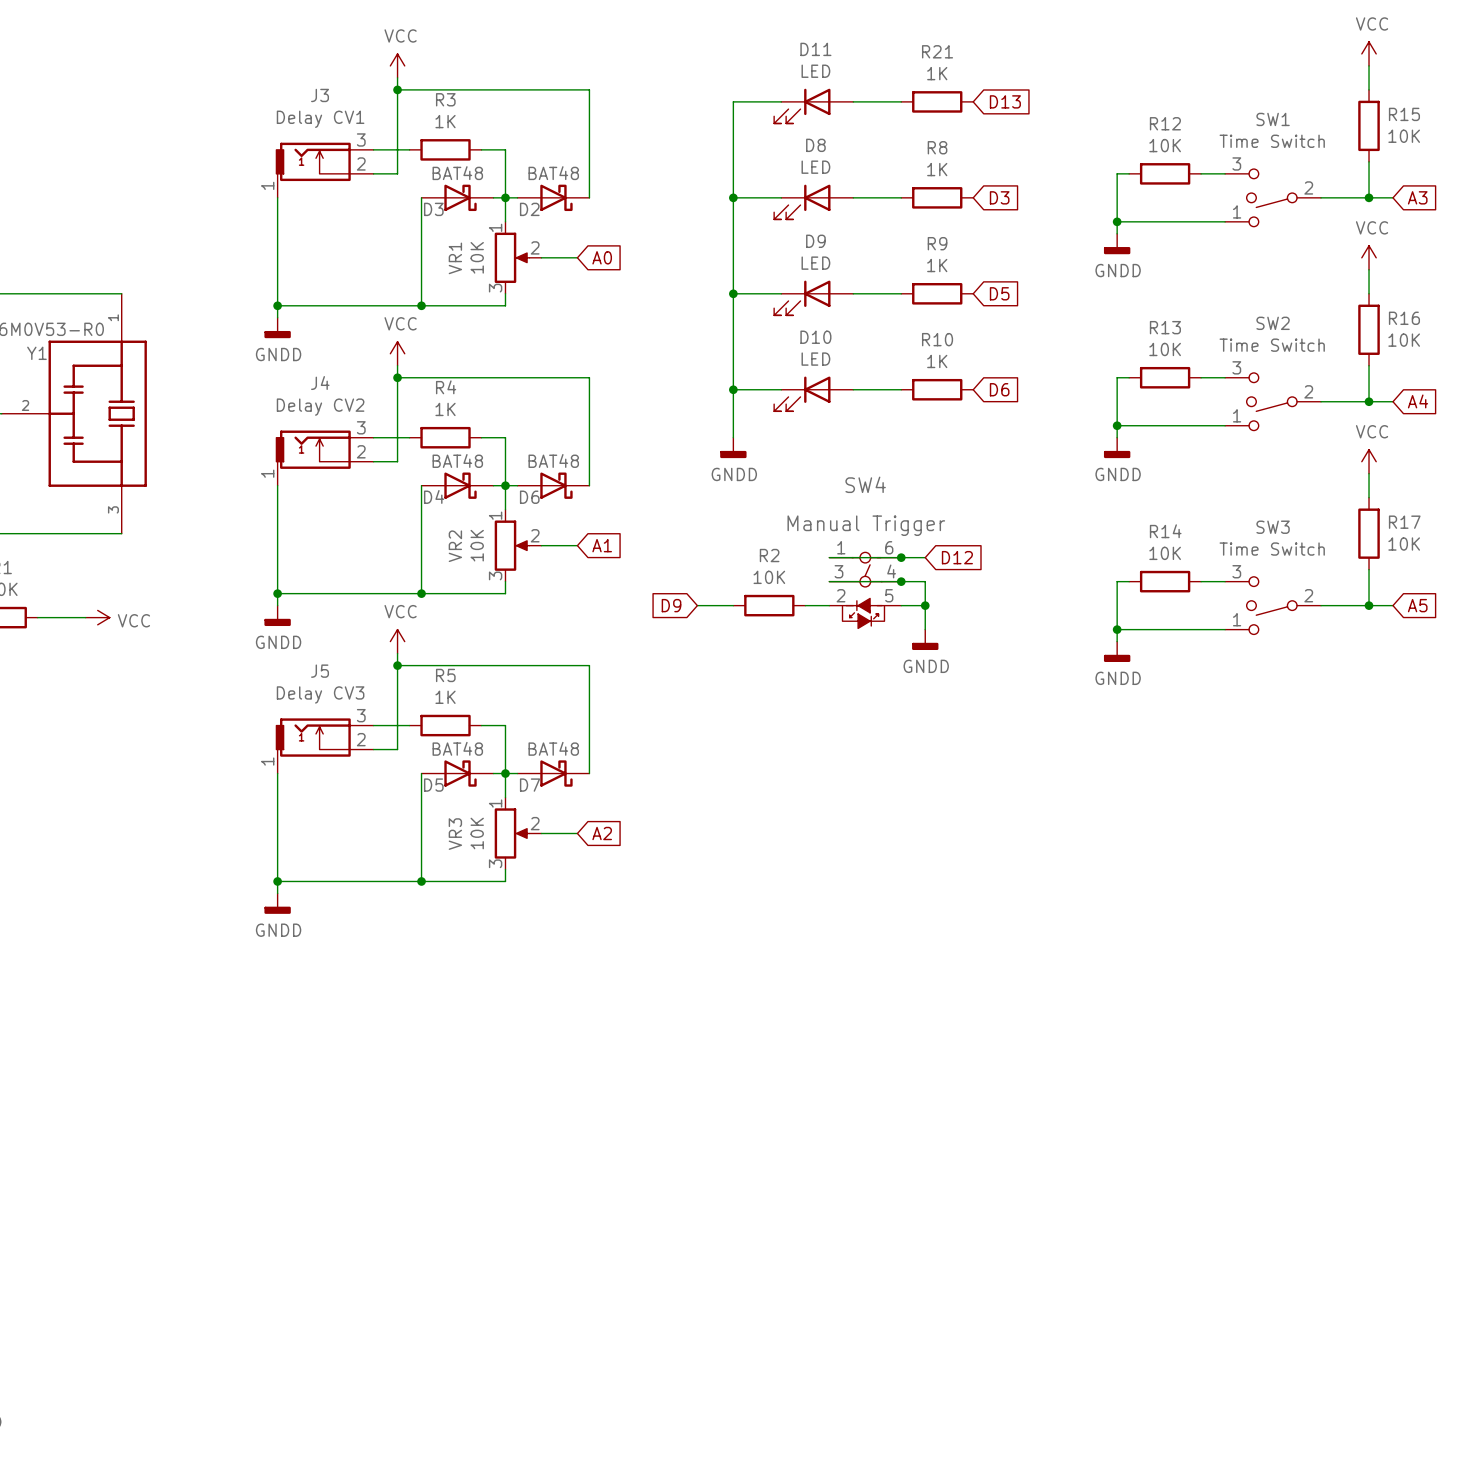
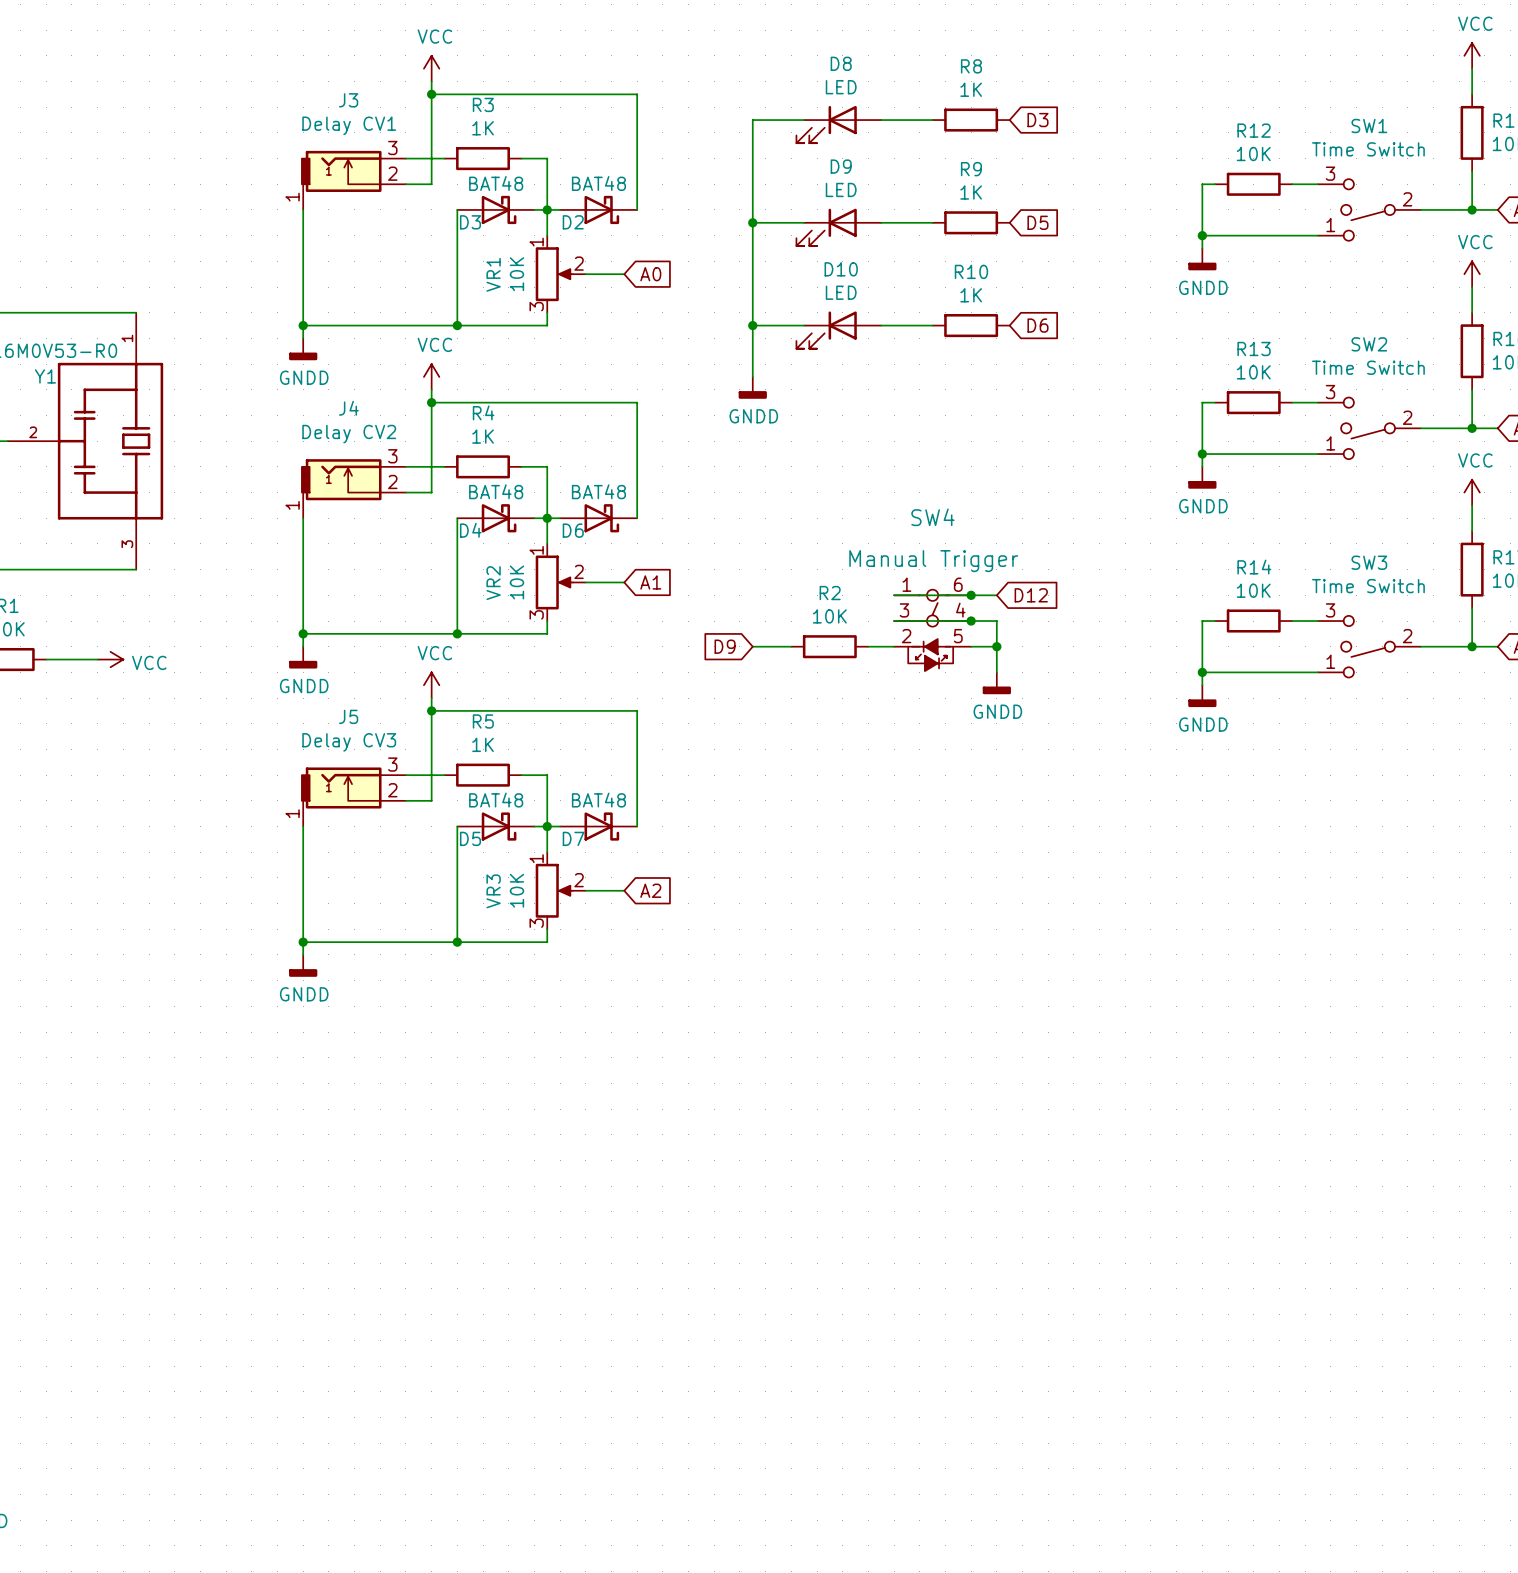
wire: (781, 101) (733, 101) (733, 437) -> none
wire: (853, 101) (901, 101) -> (881, 120) (932, 120)
R21: 1K (937, 101) -> none
global label: D13 (1005, 101) -> none
D11: LED (813, 106) -> none
wire: none -> (804, 120) (752, 120) (752, 376)
wire: (733, 197) (781, 197) -> (752, 222) (804, 222)
junction position: (733, 197) -> (752, 222)
wire: (853, 197) (901, 197) -> (881, 222) (932, 222)
R8 position: (937, 197) -> (971, 120)
global label position: D3 (999, 197) -> D3 (1037, 120)
D8 position: (813, 202) -> (838, 124)
wire: (733, 293) (781, 293) -> (752, 325) (804, 325)
junction position: (733, 293) -> (752, 325)
wire: (853, 293) (901, 293) -> (881, 325) (932, 325)
R9 position: (937, 293) -> (971, 222)
global label position: D5 (999, 293) -> D5 (1037, 222)
D9 position: (813, 297) -> (838, 227)
wire: (733, 389) (781, 389) -> none
junction: (733, 389) -> none
wire: (853, 389) (901, 389) -> none
R10 position: (937, 389) -> (971, 325)
global label position: D6 (999, 389) -> D6 (1037, 325)
D10 position: (813, 393) -> (838, 330)
power symbol position: GNDD (733, 447) -> GNDD (752, 387)

